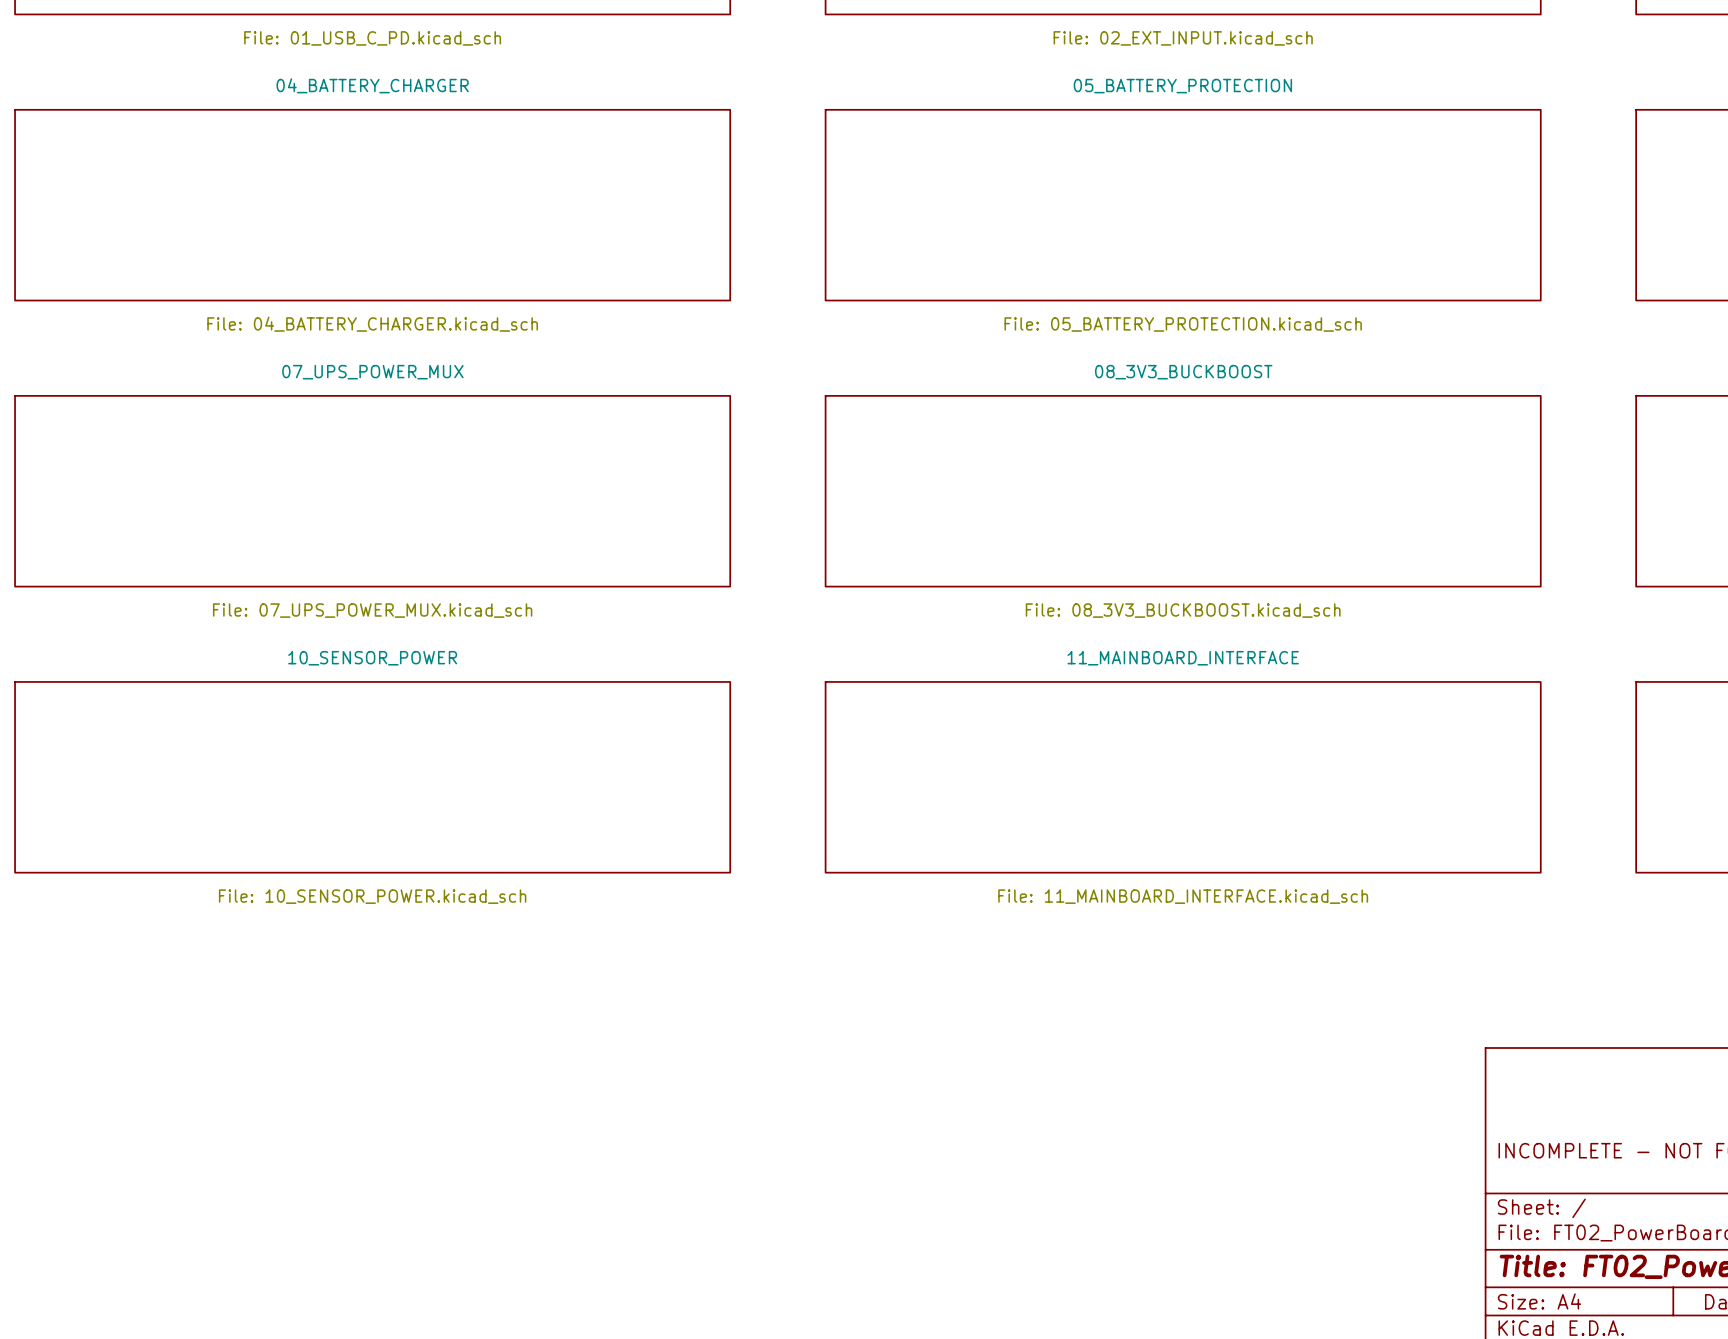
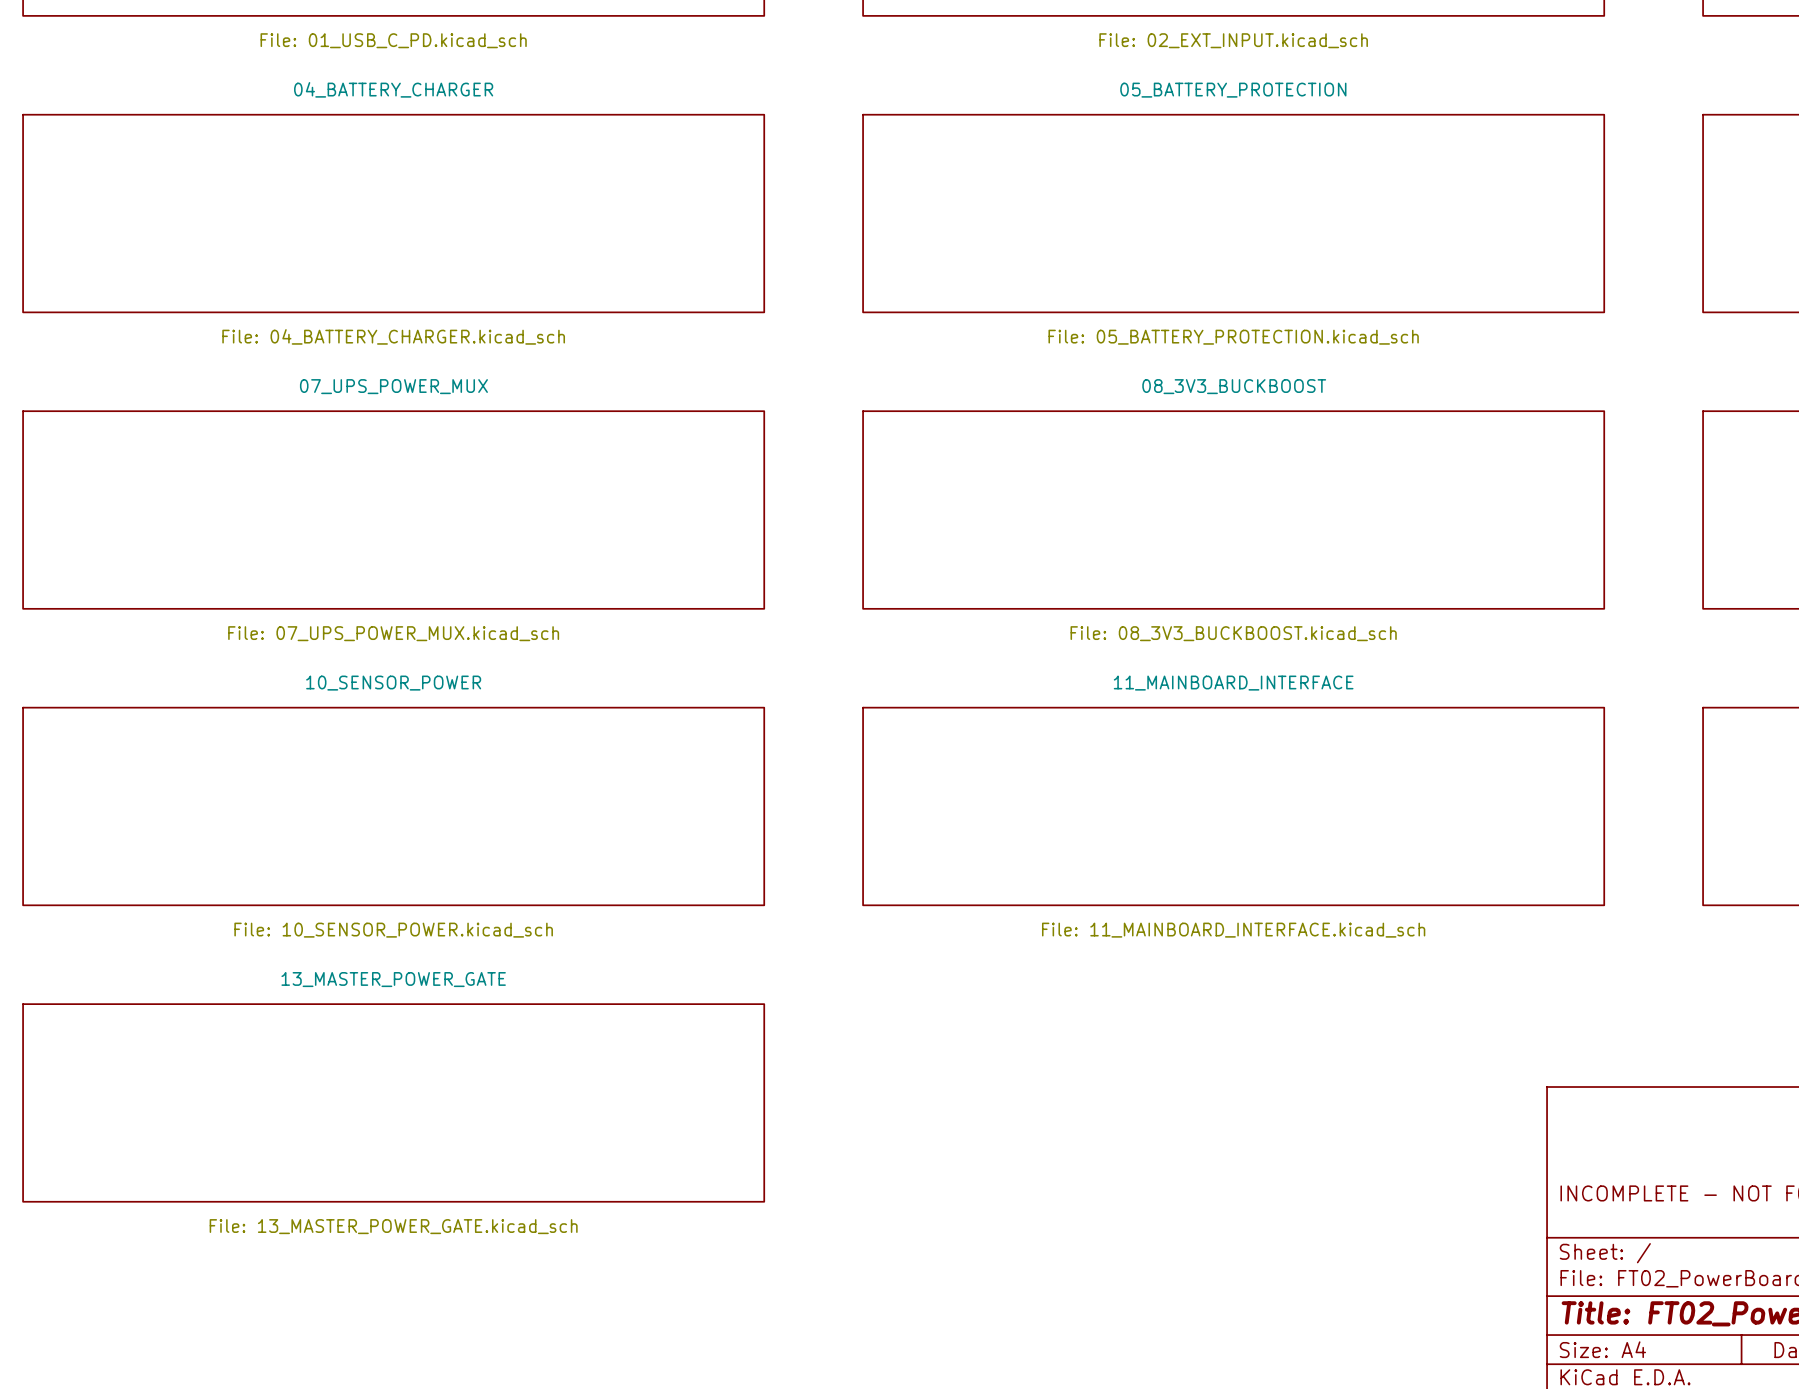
sheet 13_MASTER_POWER_GATE: none -> File: 13_MASTER_POWER_GATE.kicad_sch (393, 1102)

